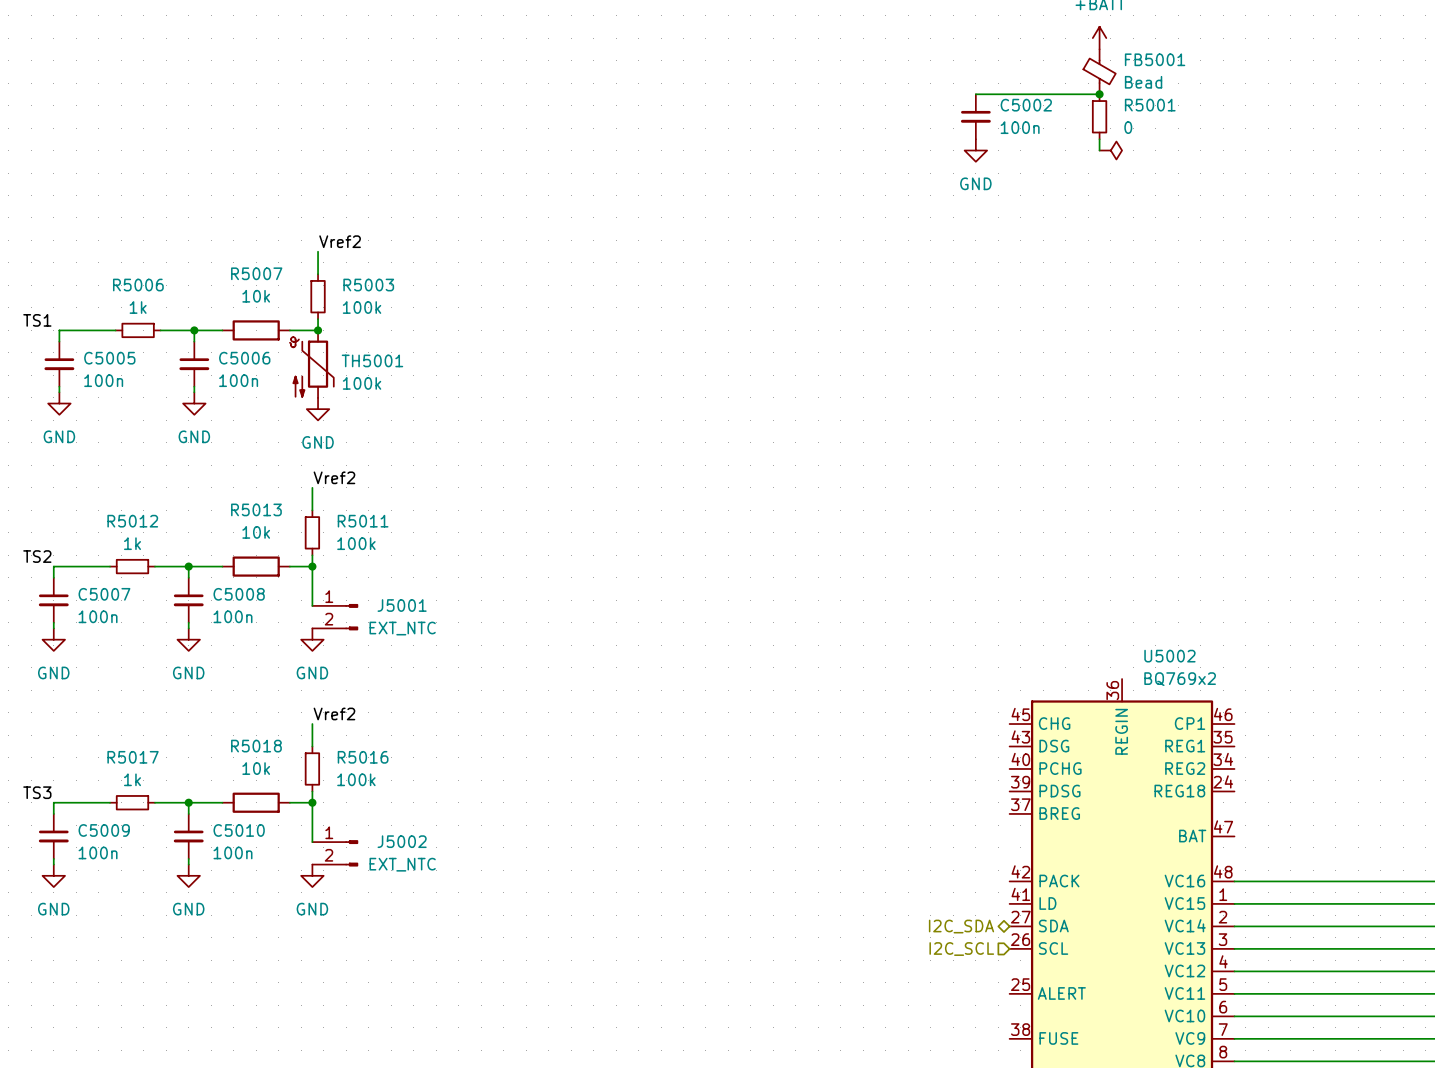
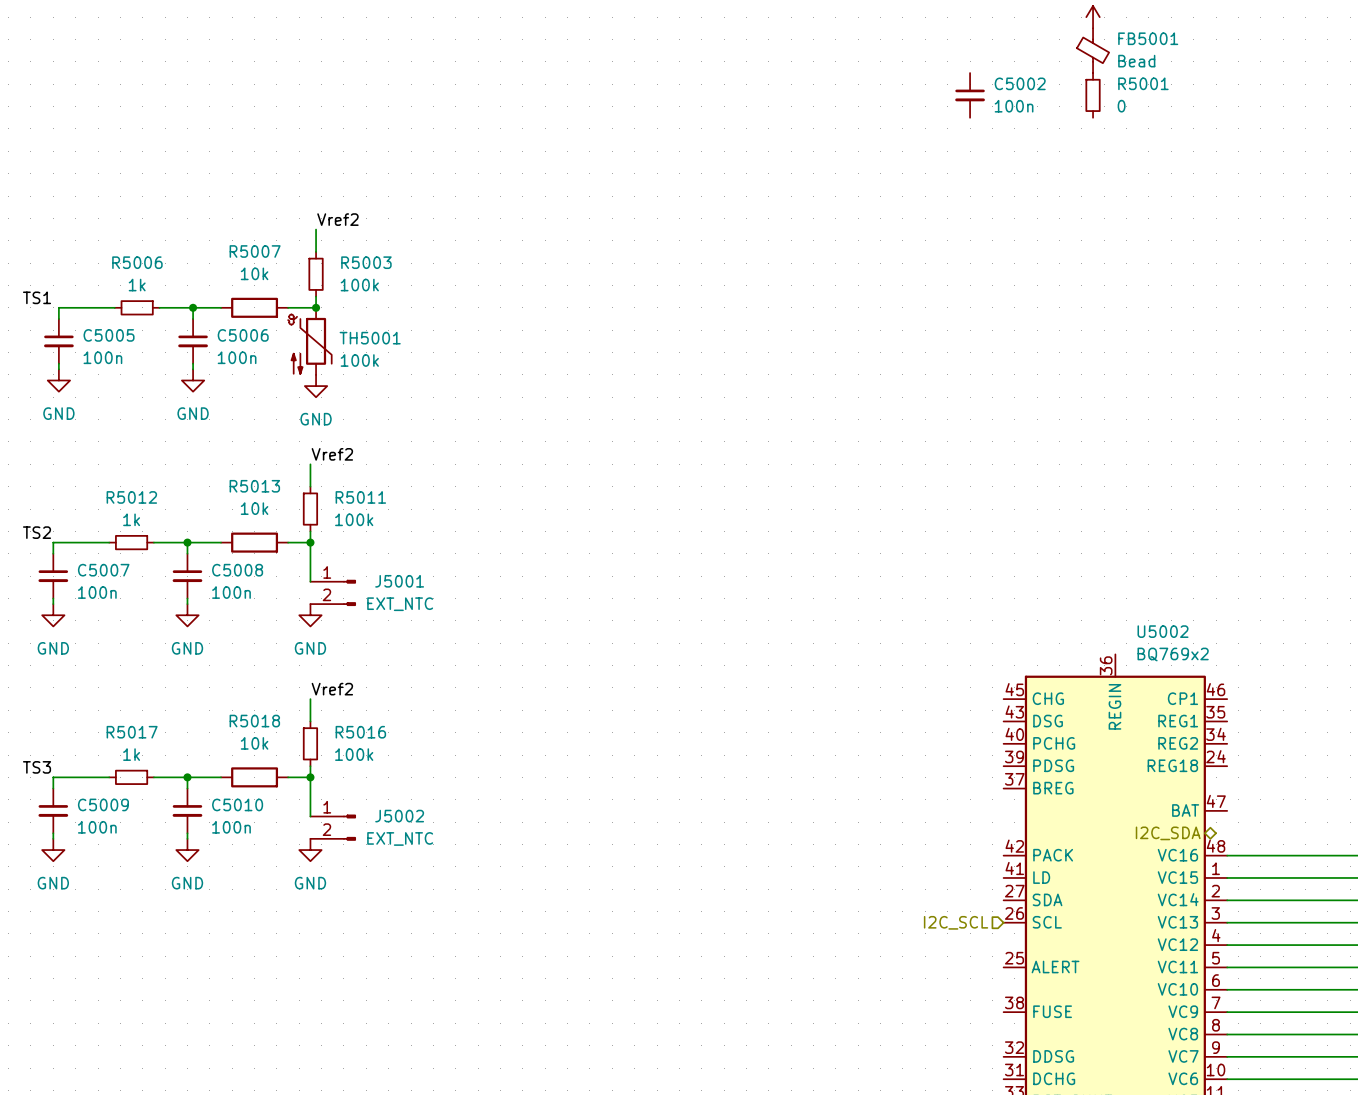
wire: (975, 94) (1099, 94) -> none
junction: (1099, 94) -> none
wire: (1099, 139) (1099, 150) -> none
power symbol: GND (975, 150) -> none
power symbol: (1110, 150) -> none
hierarchical label: none -> I2C_SDA (1168, 833)
hierarchical label: I2C_SDA (961, 926) -> none

